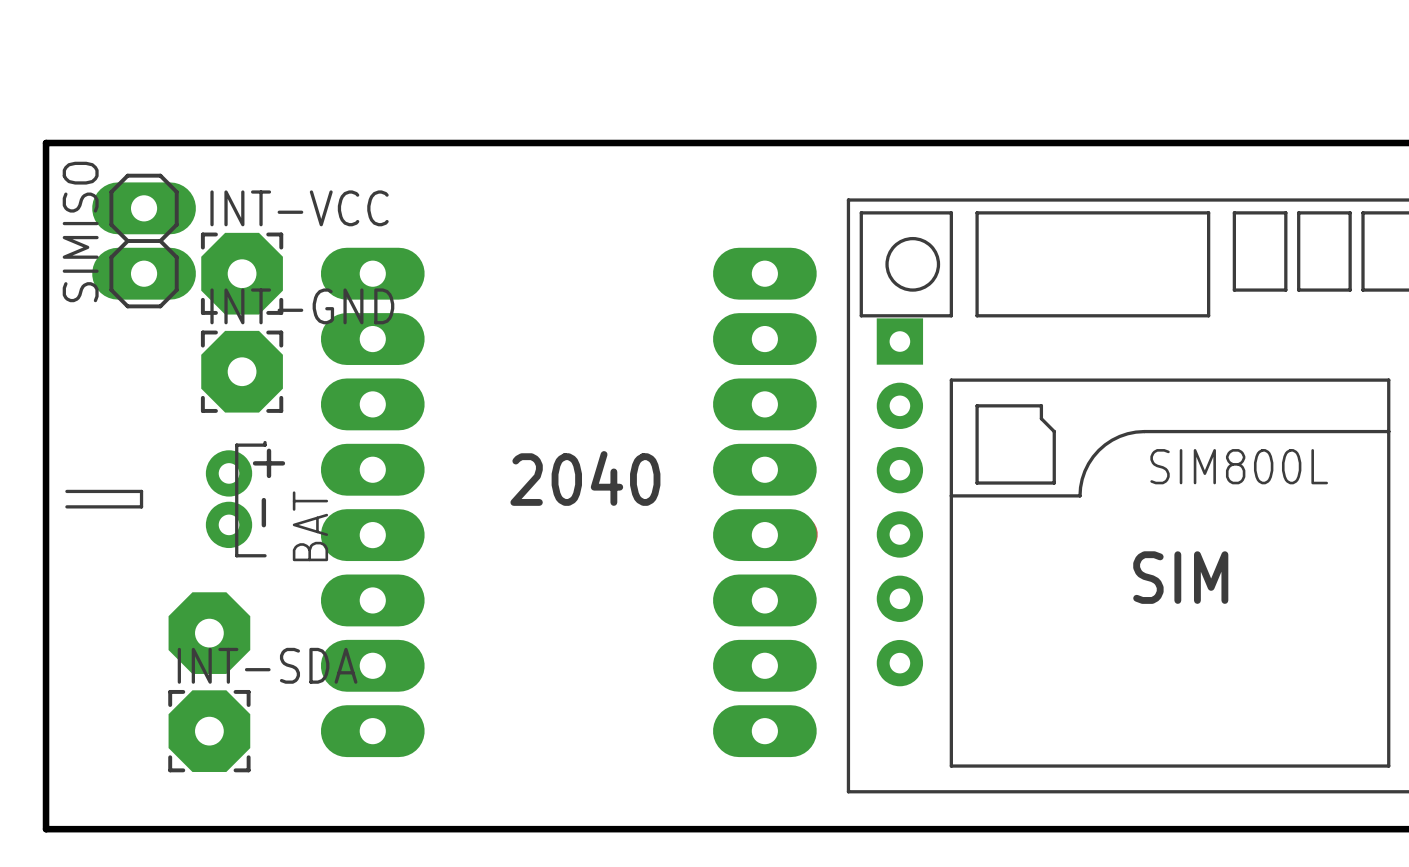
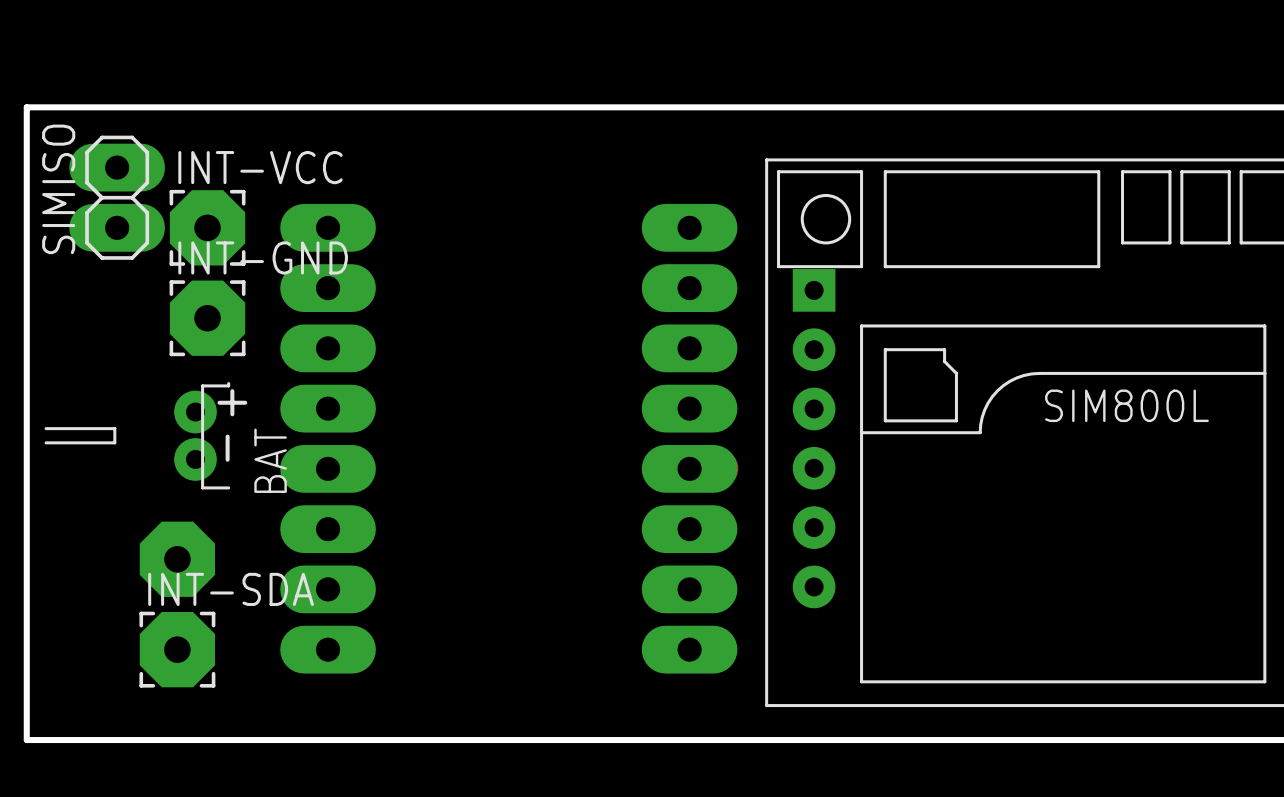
text: 2040 (585, 478) -> none
text: SIM (1180, 577) -> none

